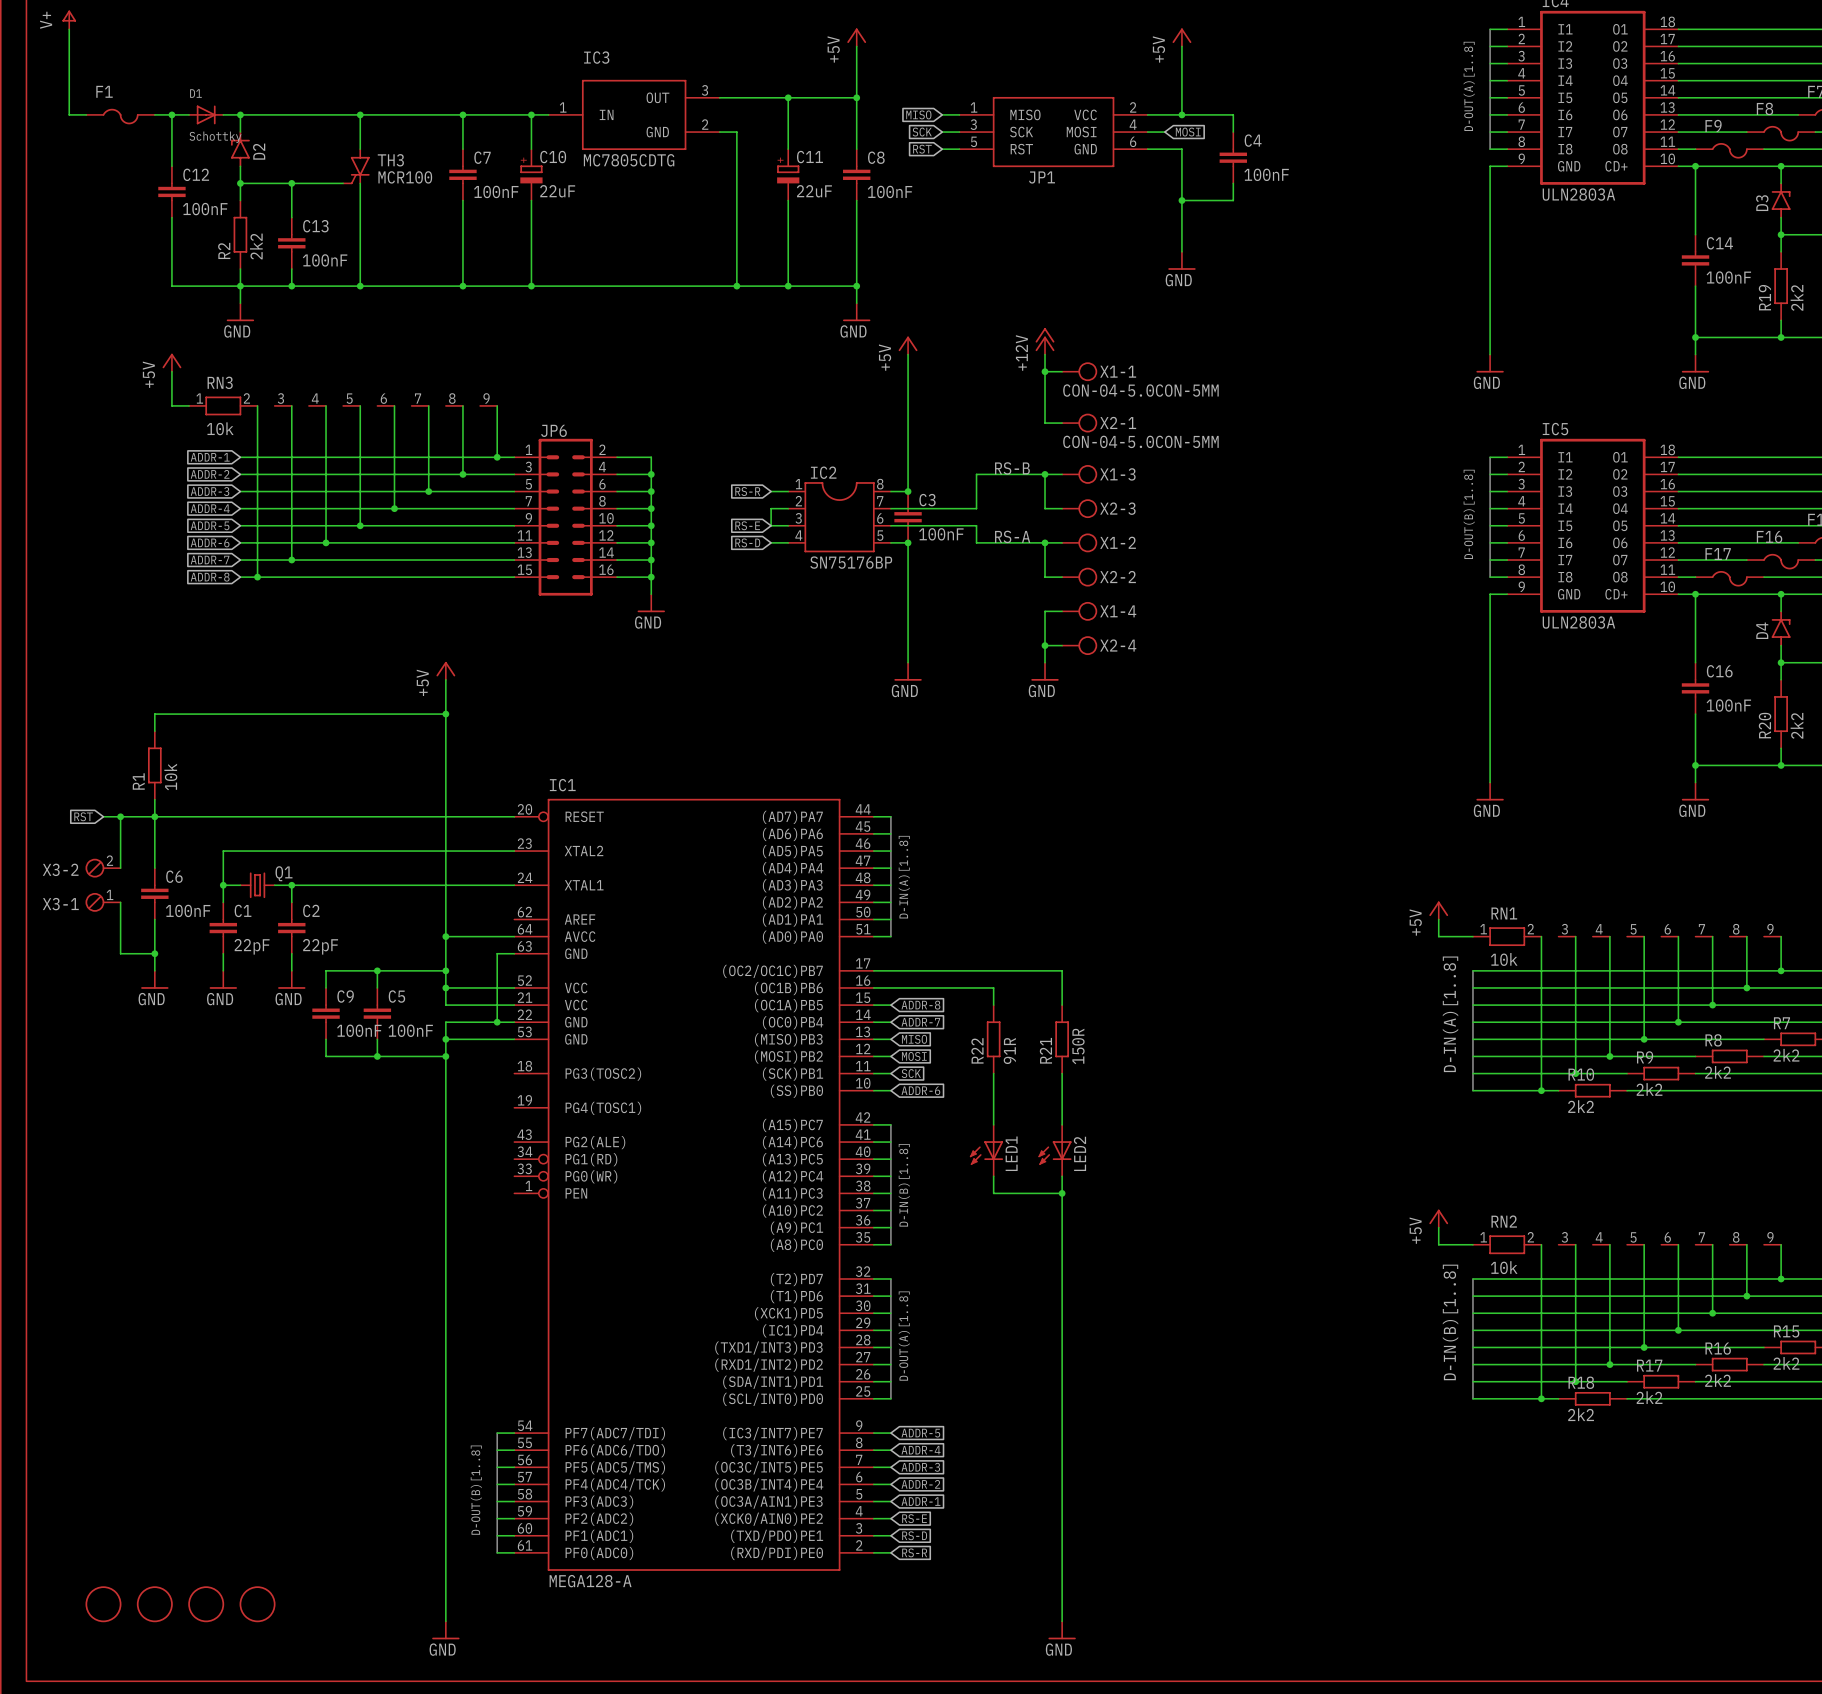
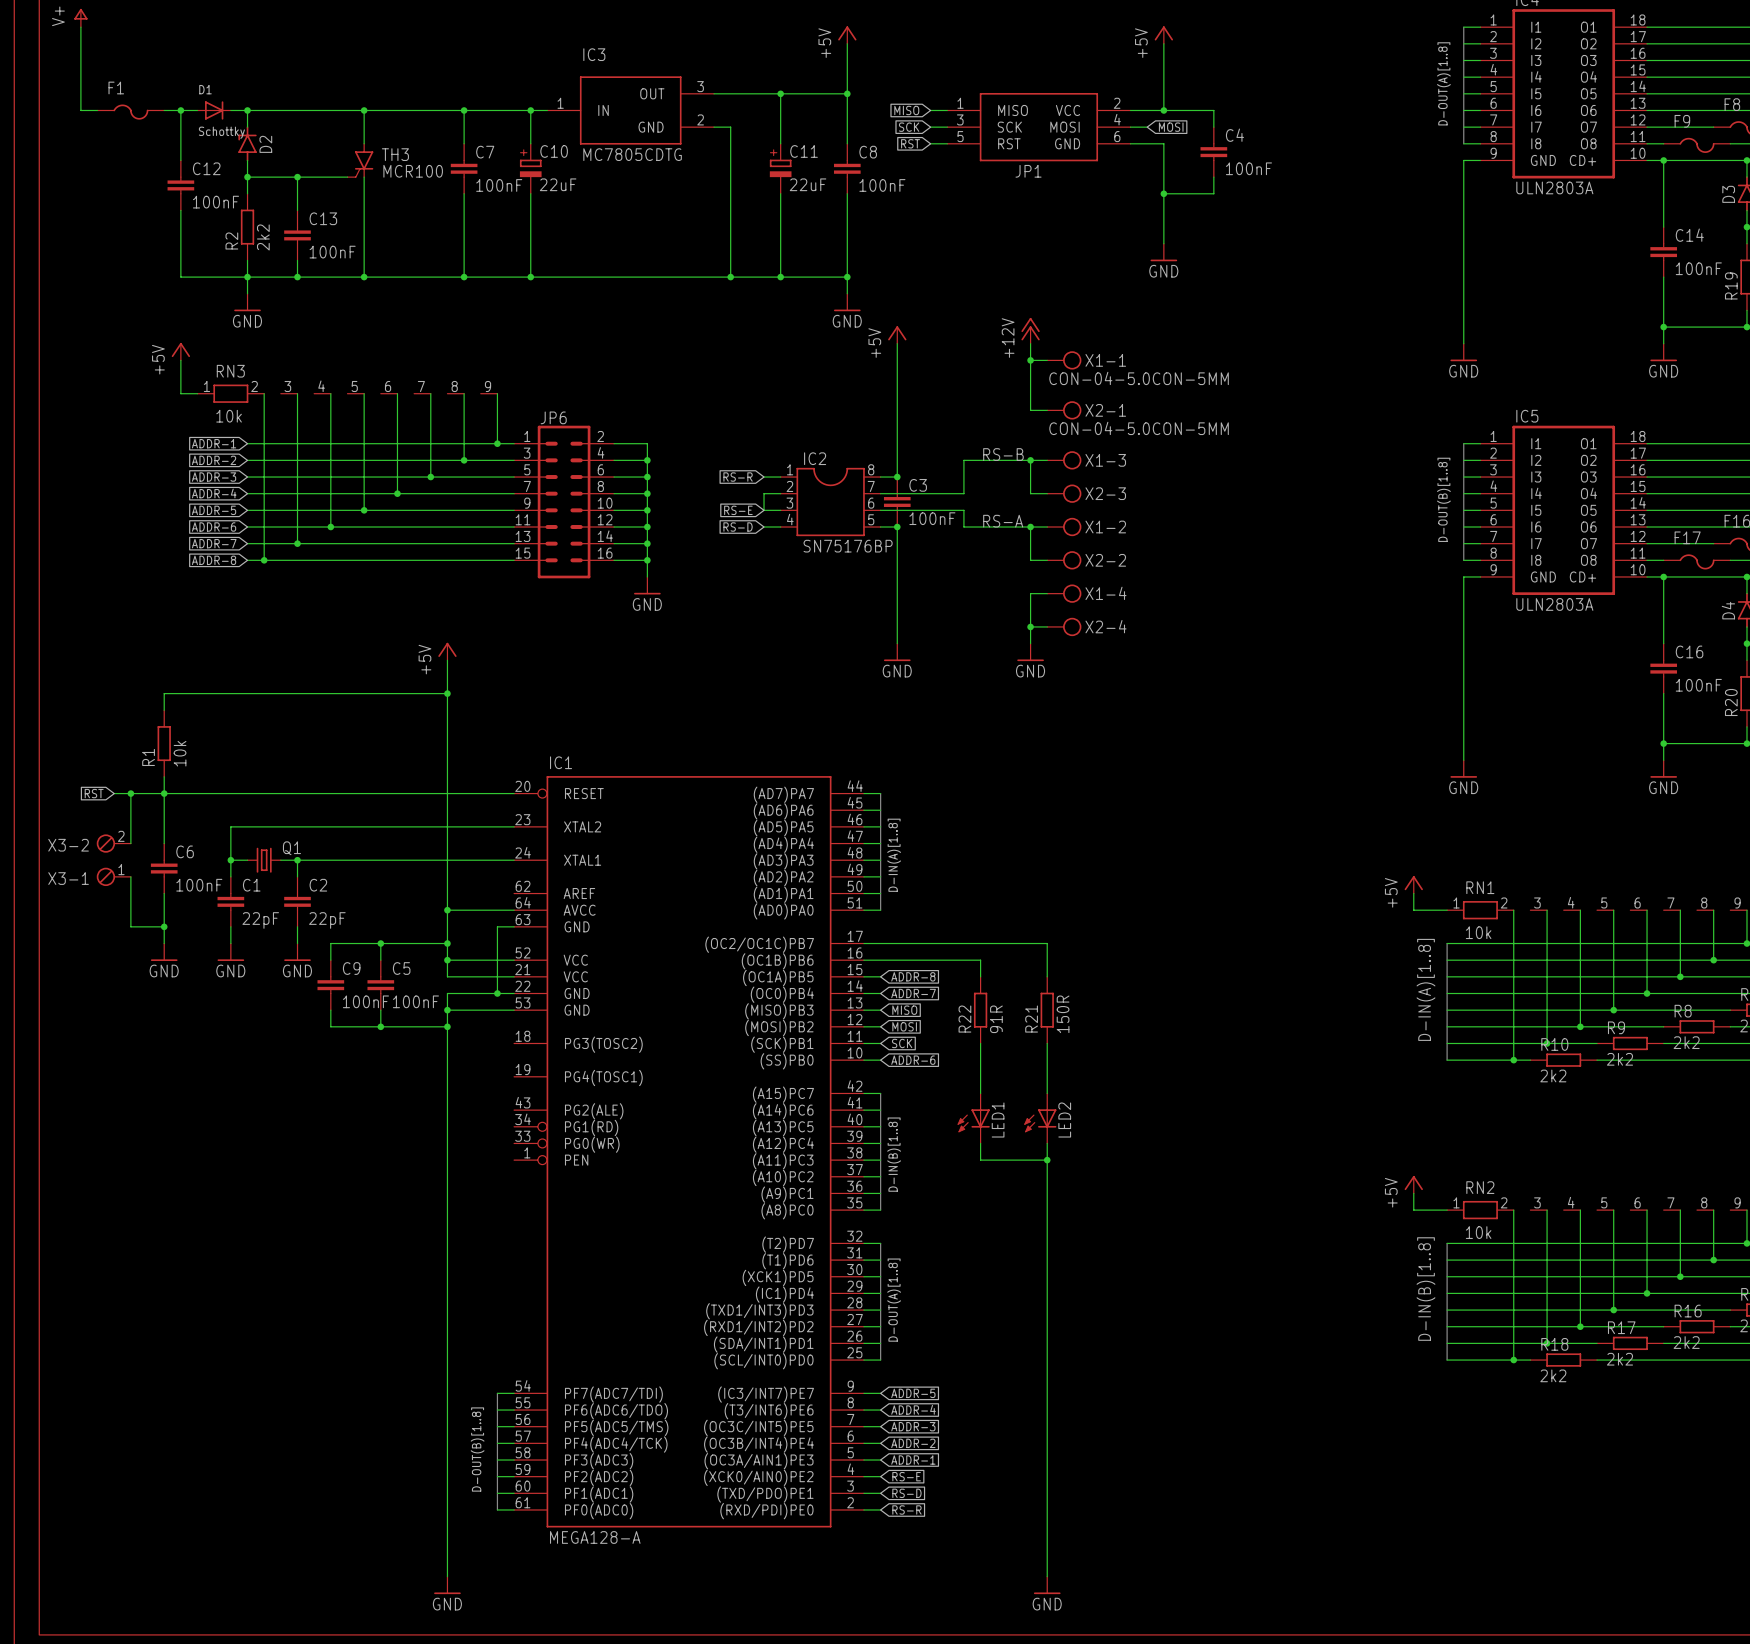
part: (103, 1604) -> none
part: (154, 1604) -> none
part: (206, 1604) -> none
part: (257, 1604) -> none

